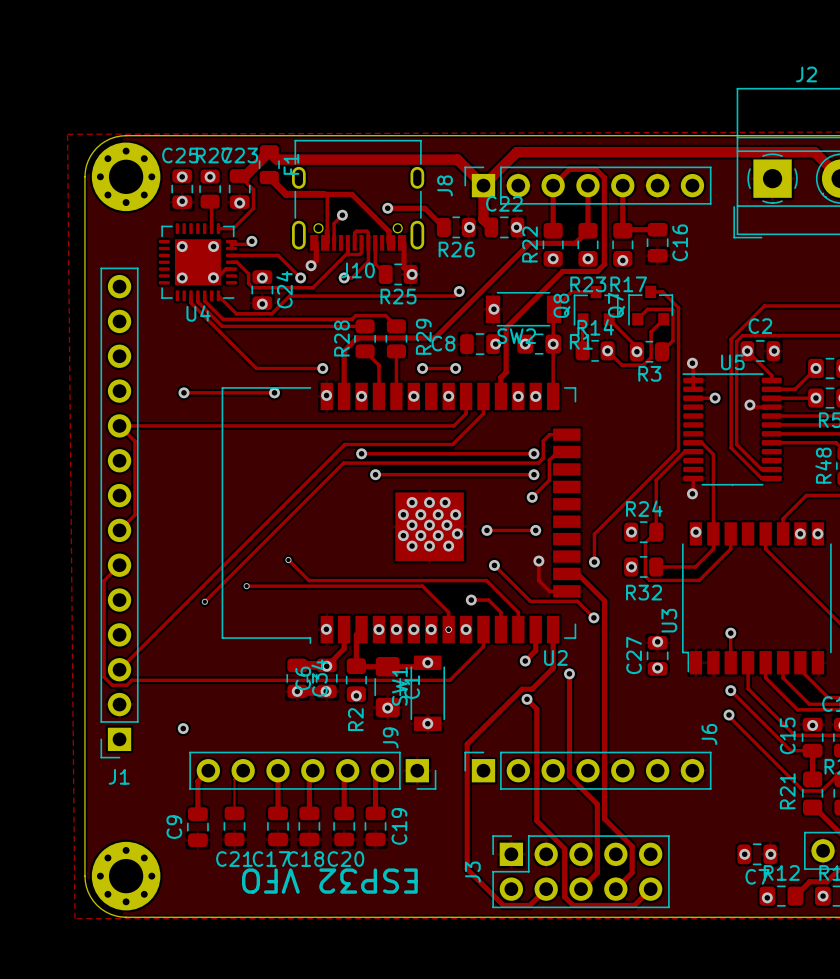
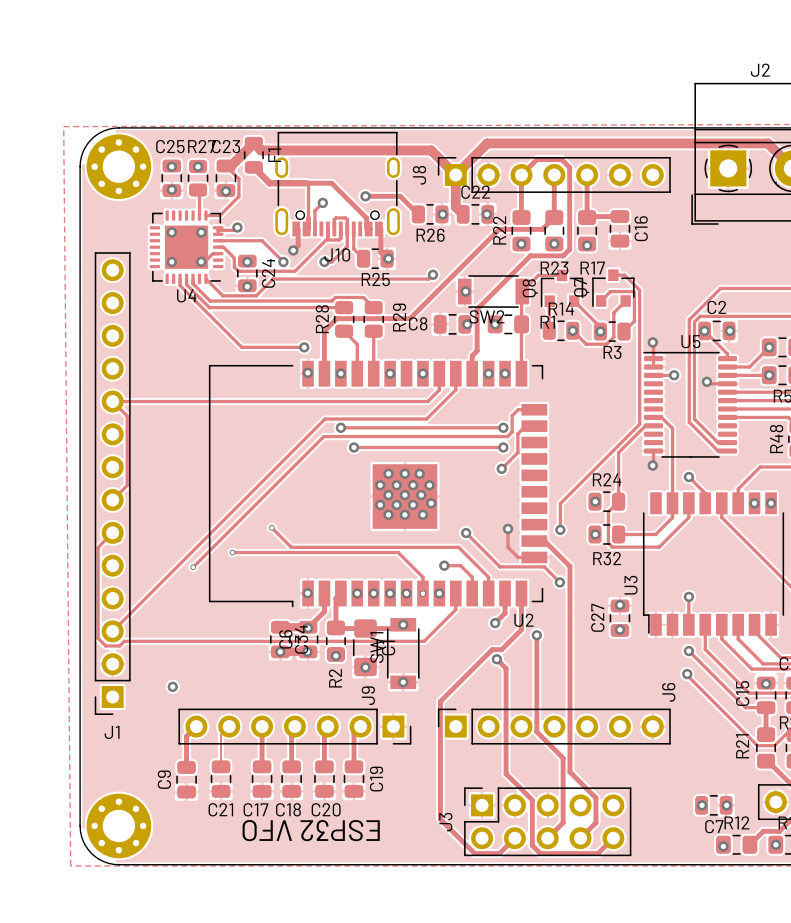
via: (553, 344) -> none
track: (422, 368) (455, 368) -> none
via: (422, 368) -> none
via: (455, 368) -> none
track: (183, 392) (274, 392) -> none
via: (183, 392) -> none
via: (274, 392) -> none
track: none -> (688, 477) (705, 493) (705, 503)
track: (486, 530) (535, 530) -> none
via: (486, 530) -> none
via: (535, 530) -> none
via position: (695, 532) -> (688, 477)

